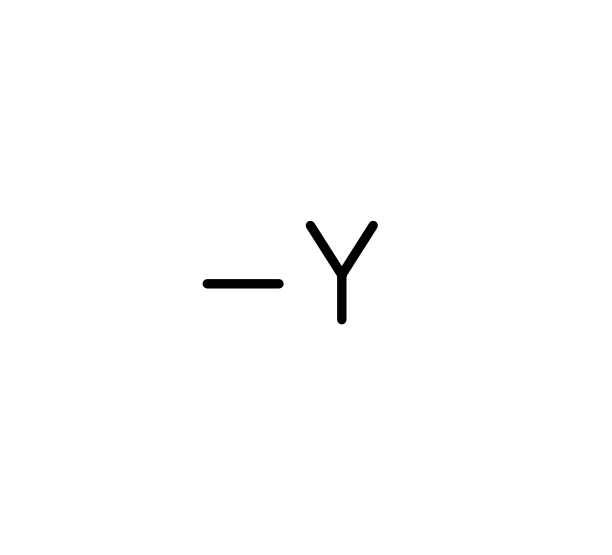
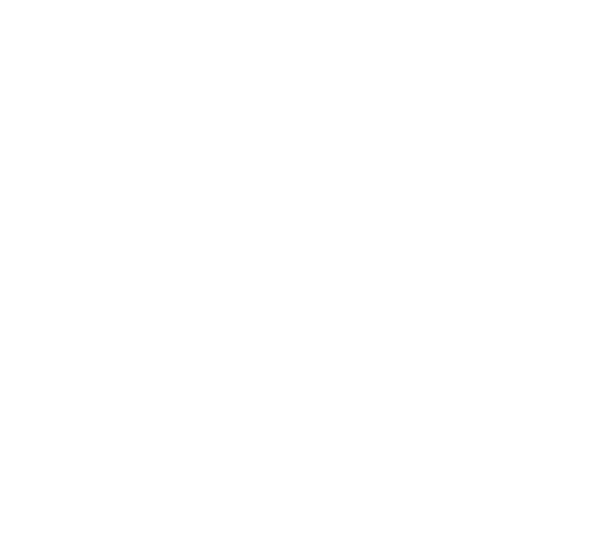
text: -Y (290, 272) -> none

